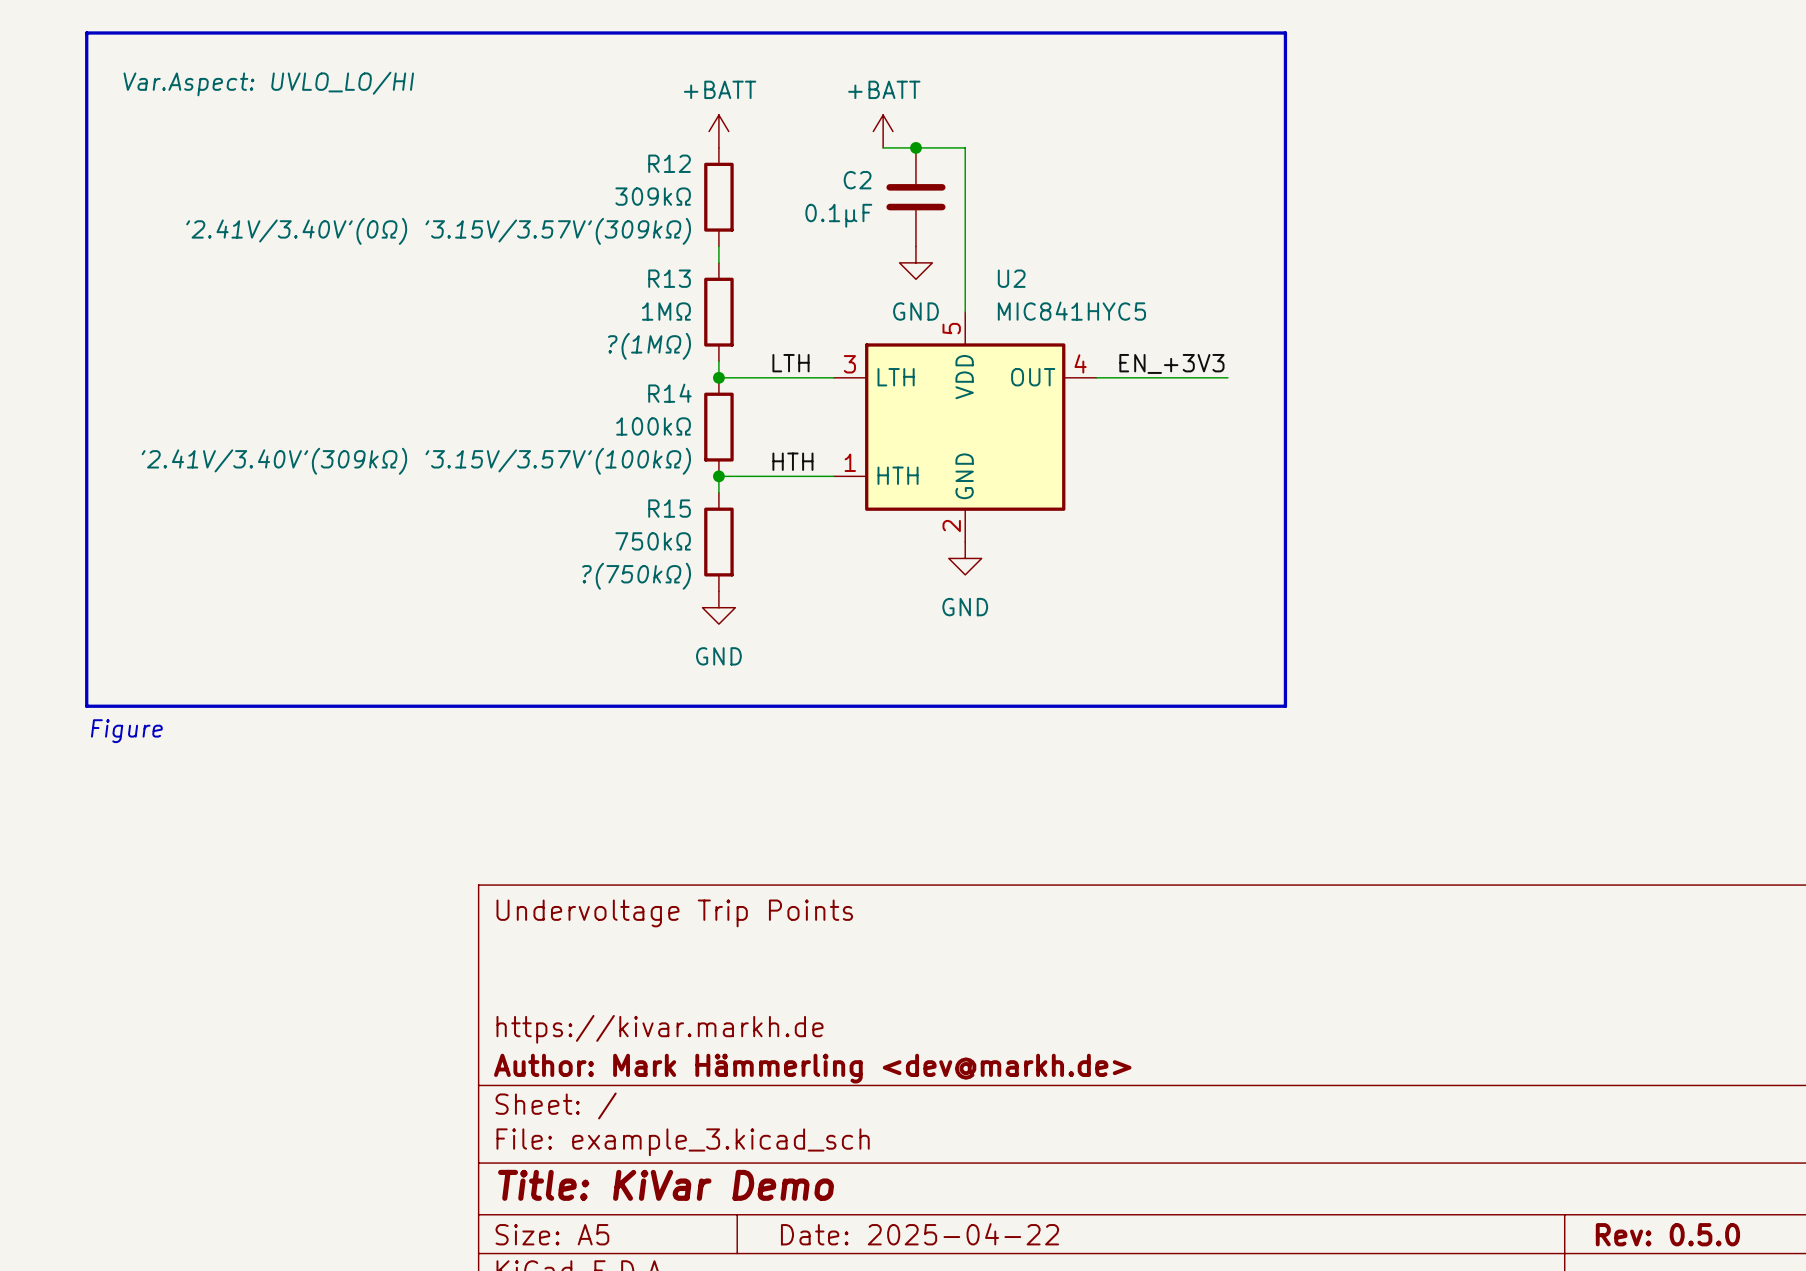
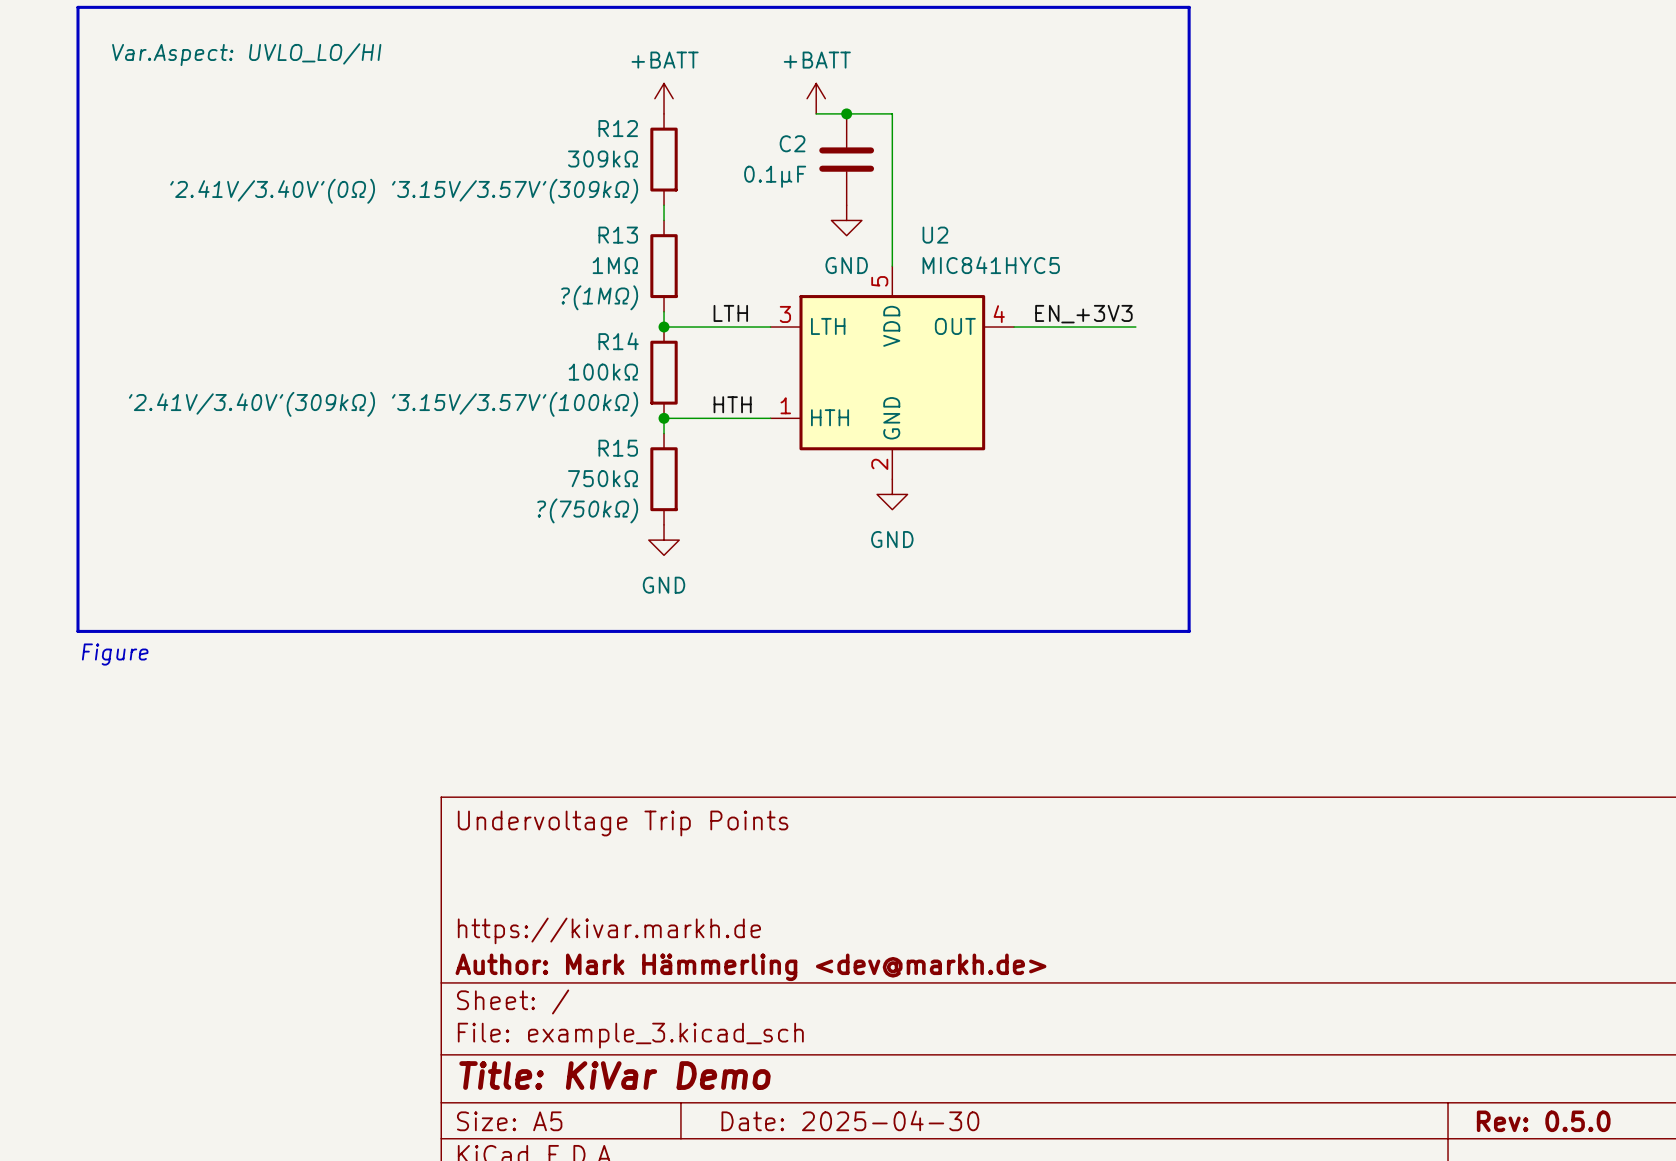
title block: Date: 2025-04-22 (919, 1234) -> Date: 2025-04-30 (850, 1120)

